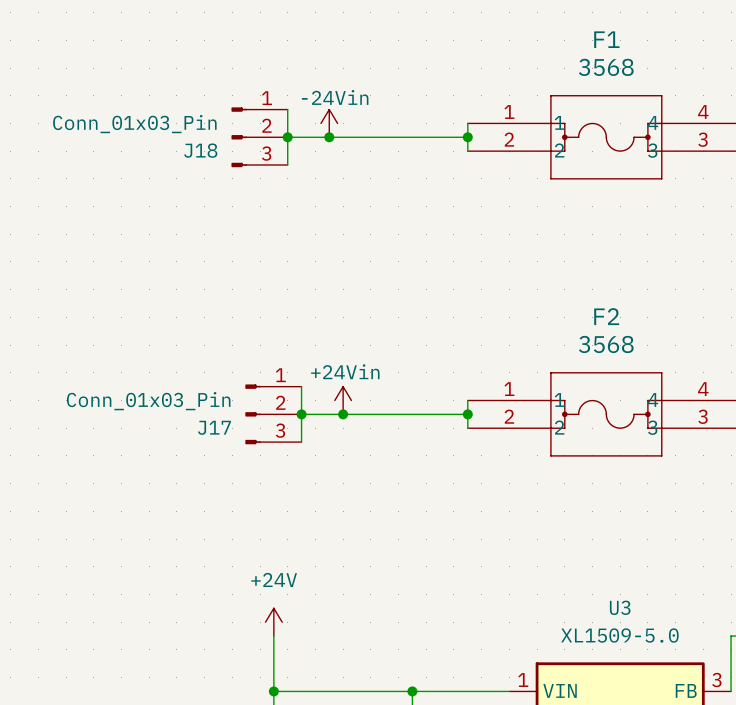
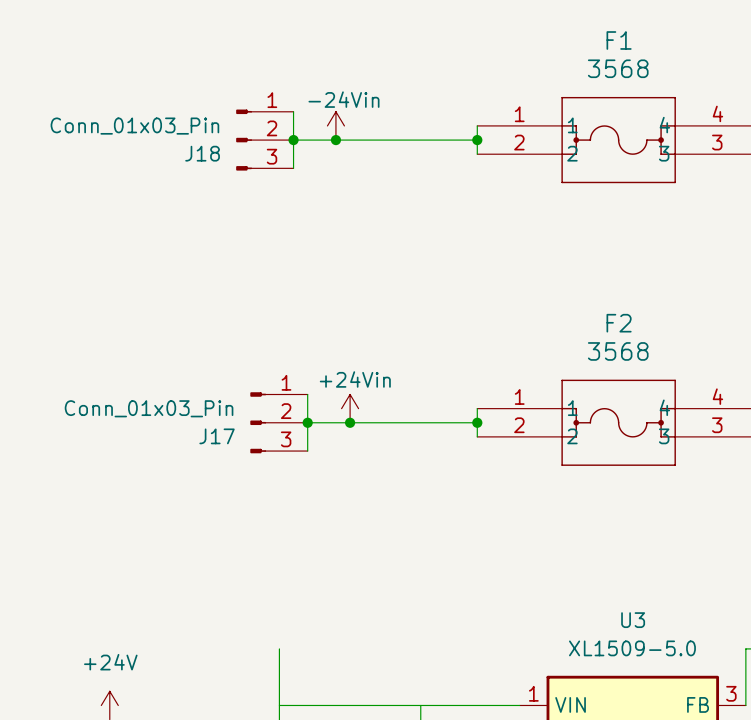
power symbol position: +24V (273, 622) -> +24V (109, 705)
junction: (273, 691) -> none
junction: (412, 691) -> none

